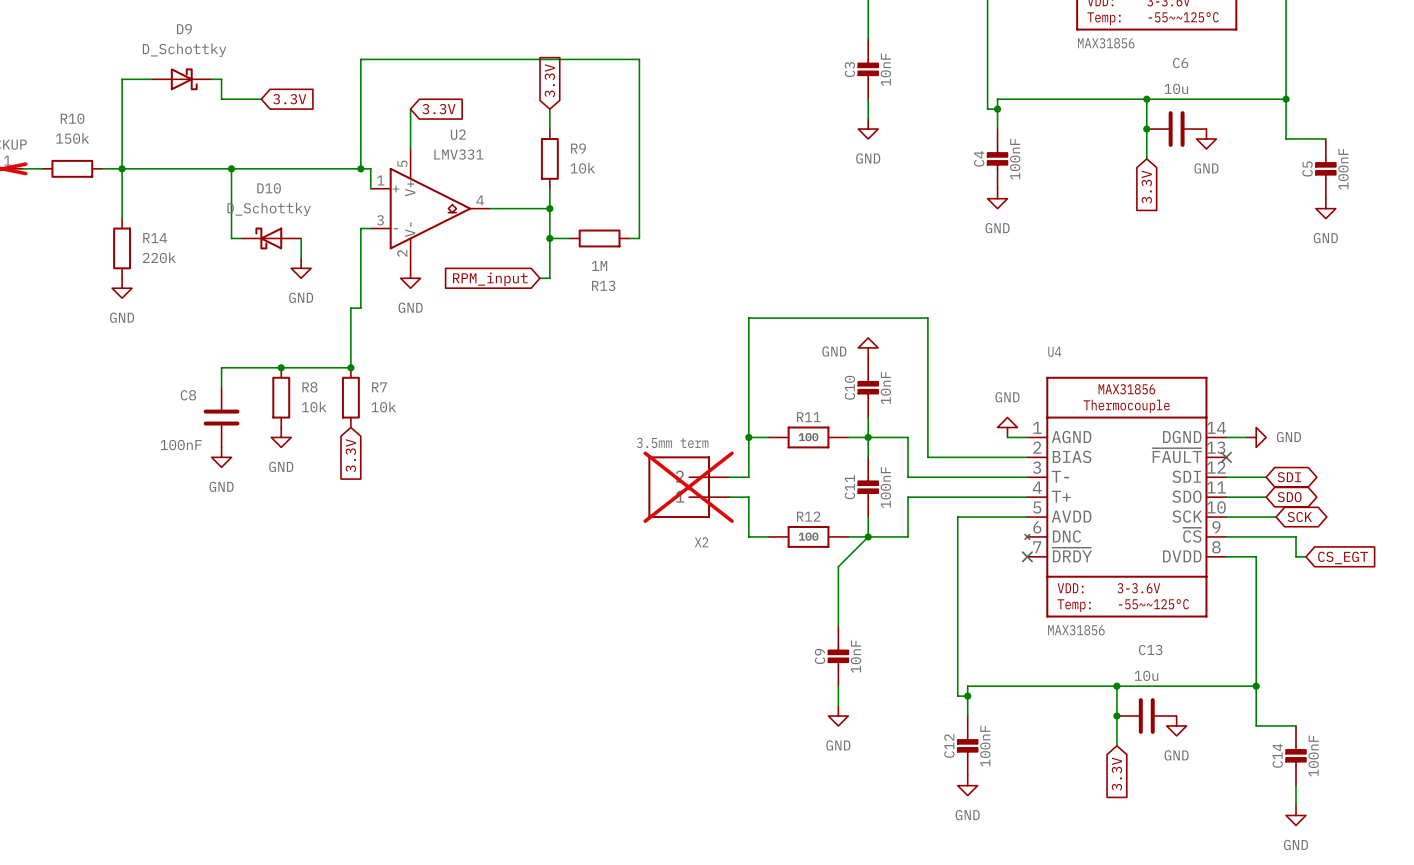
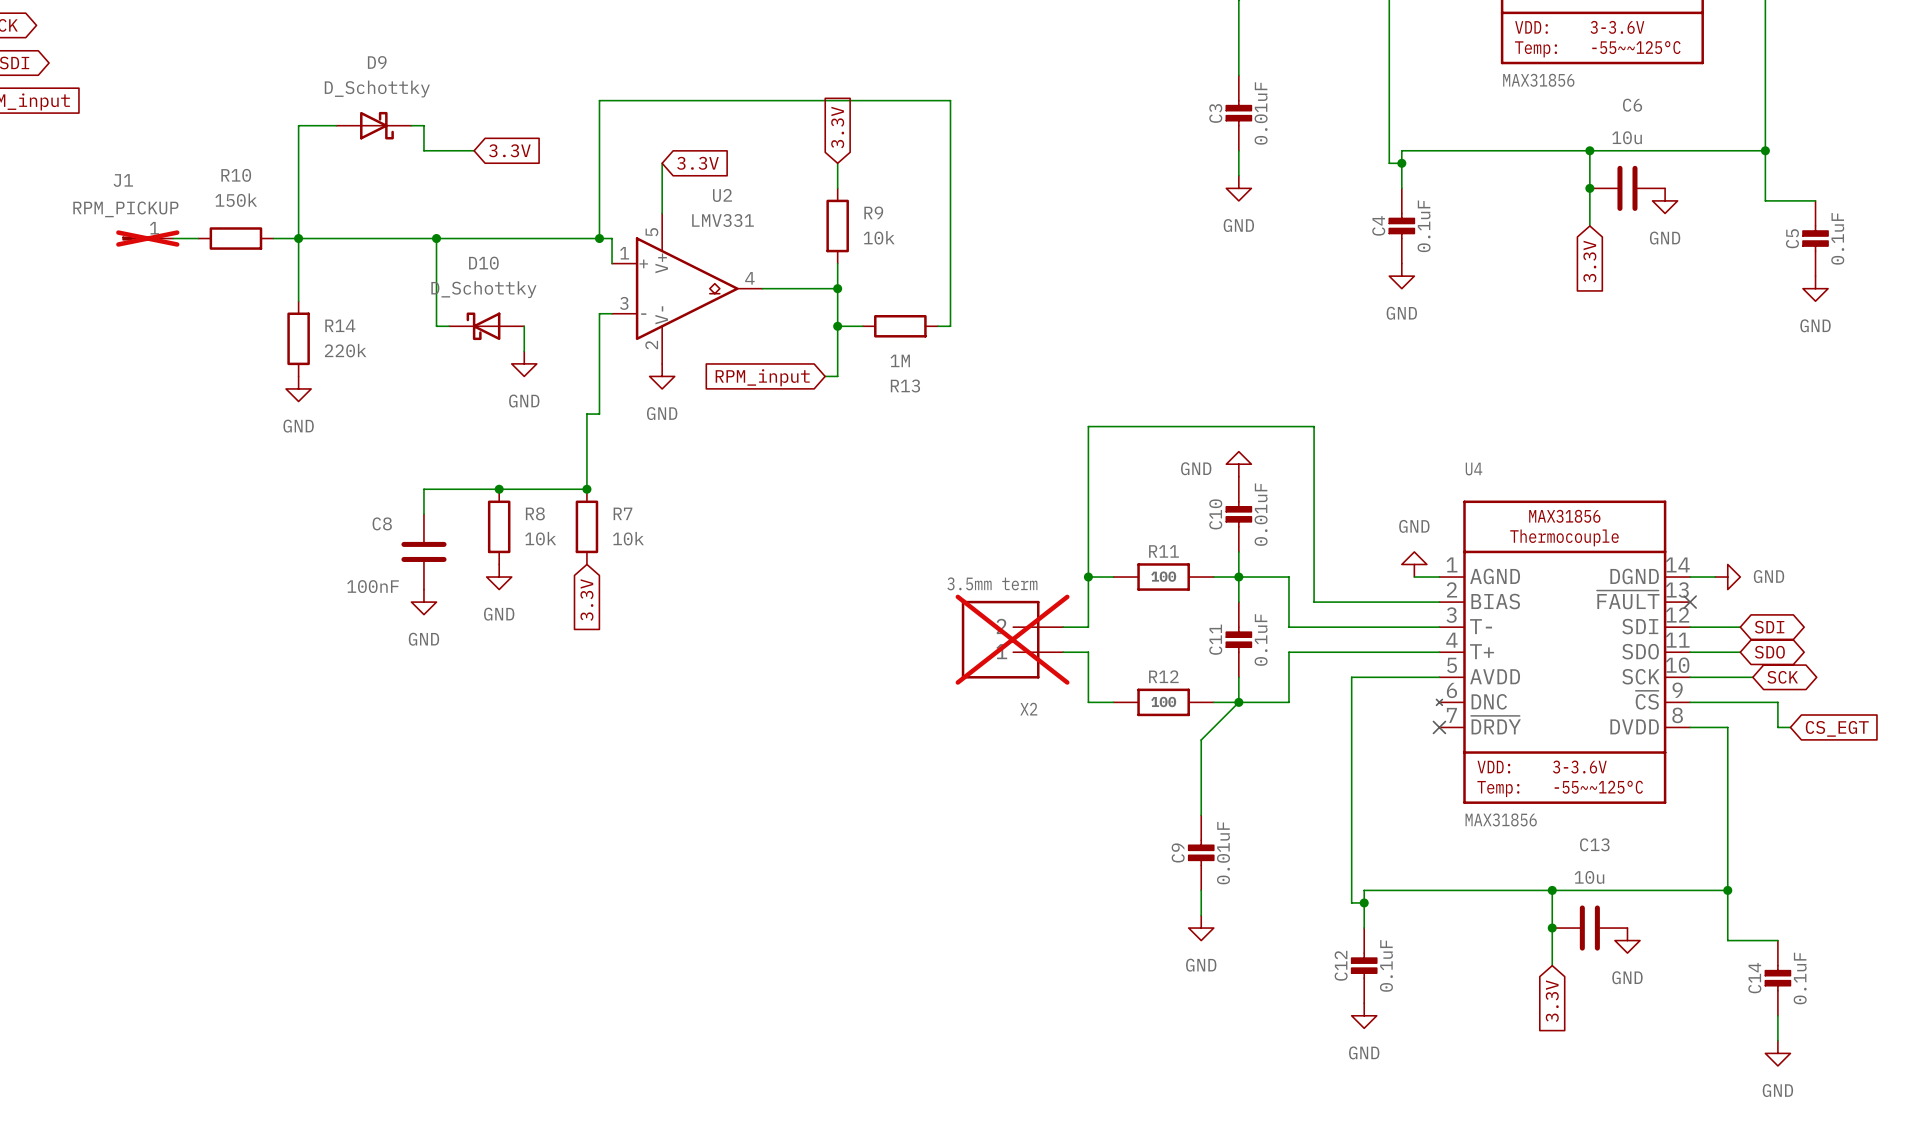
C3 value: 10nF (885, 69) -> 0.01uF (1261, 113)
C4 value: 100nF (1015, 159) -> 0.1uF (1424, 226)
C5 value: 100nF (1343, 169) -> 0.1uF (1837, 238)
C10 value: 10nF (885, 387) -> 0.01uF (1261, 514)
C11 value: 100nF (885, 487) -> 0.1uF (1261, 640)
C9 value: 10nF (856, 656) -> 0.01uF (1223, 853)
C12 value: 100nF (985, 746) -> 0.1uF (1386, 965)
C14 value: 100nF (1313, 756) -> 0.1uF (1800, 978)

